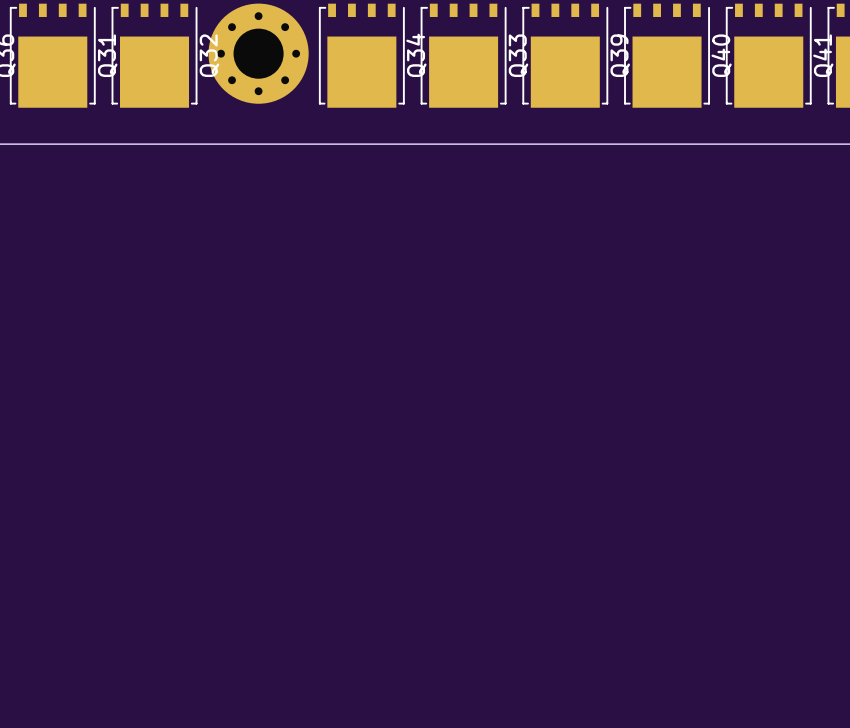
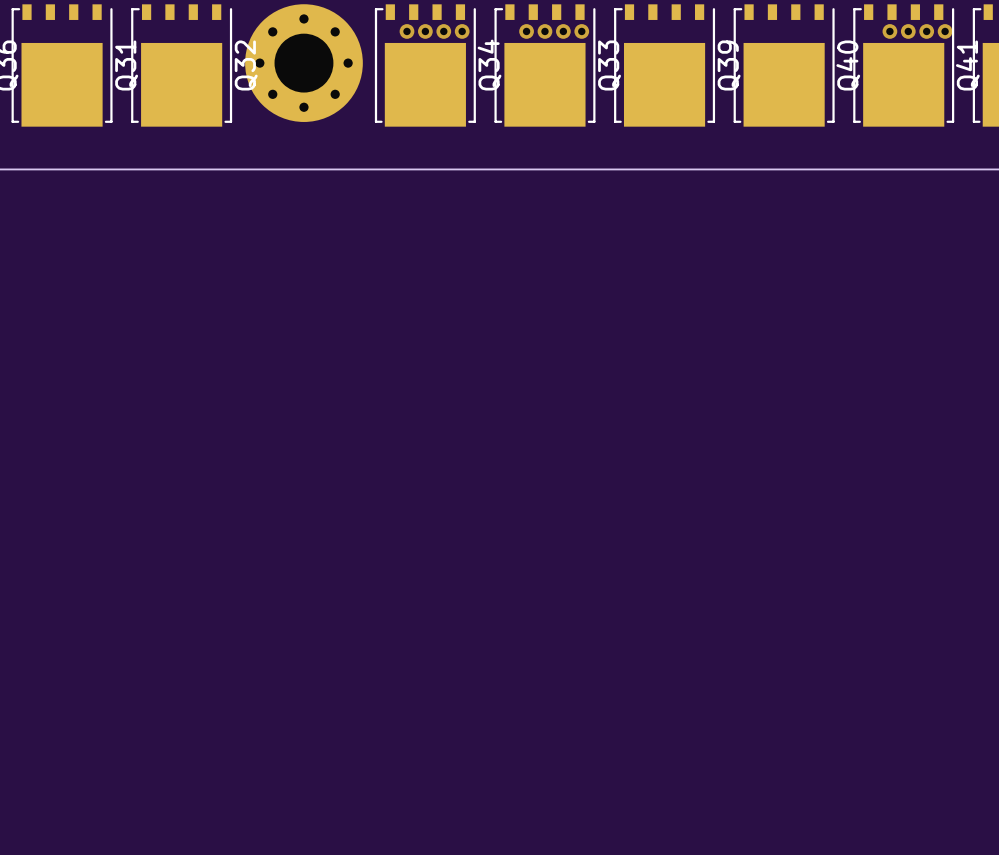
via: none -> (406, 31)
via: none -> (425, 31)
via: none -> (443, 31)
via: none -> (462, 31)
via: none -> (526, 31)
via: none -> (544, 31)
via: none -> (563, 31)
via: none -> (581, 31)
via: none -> (889, 31)
via: none -> (908, 31)
via: none -> (926, 31)
via: none -> (945, 31)

